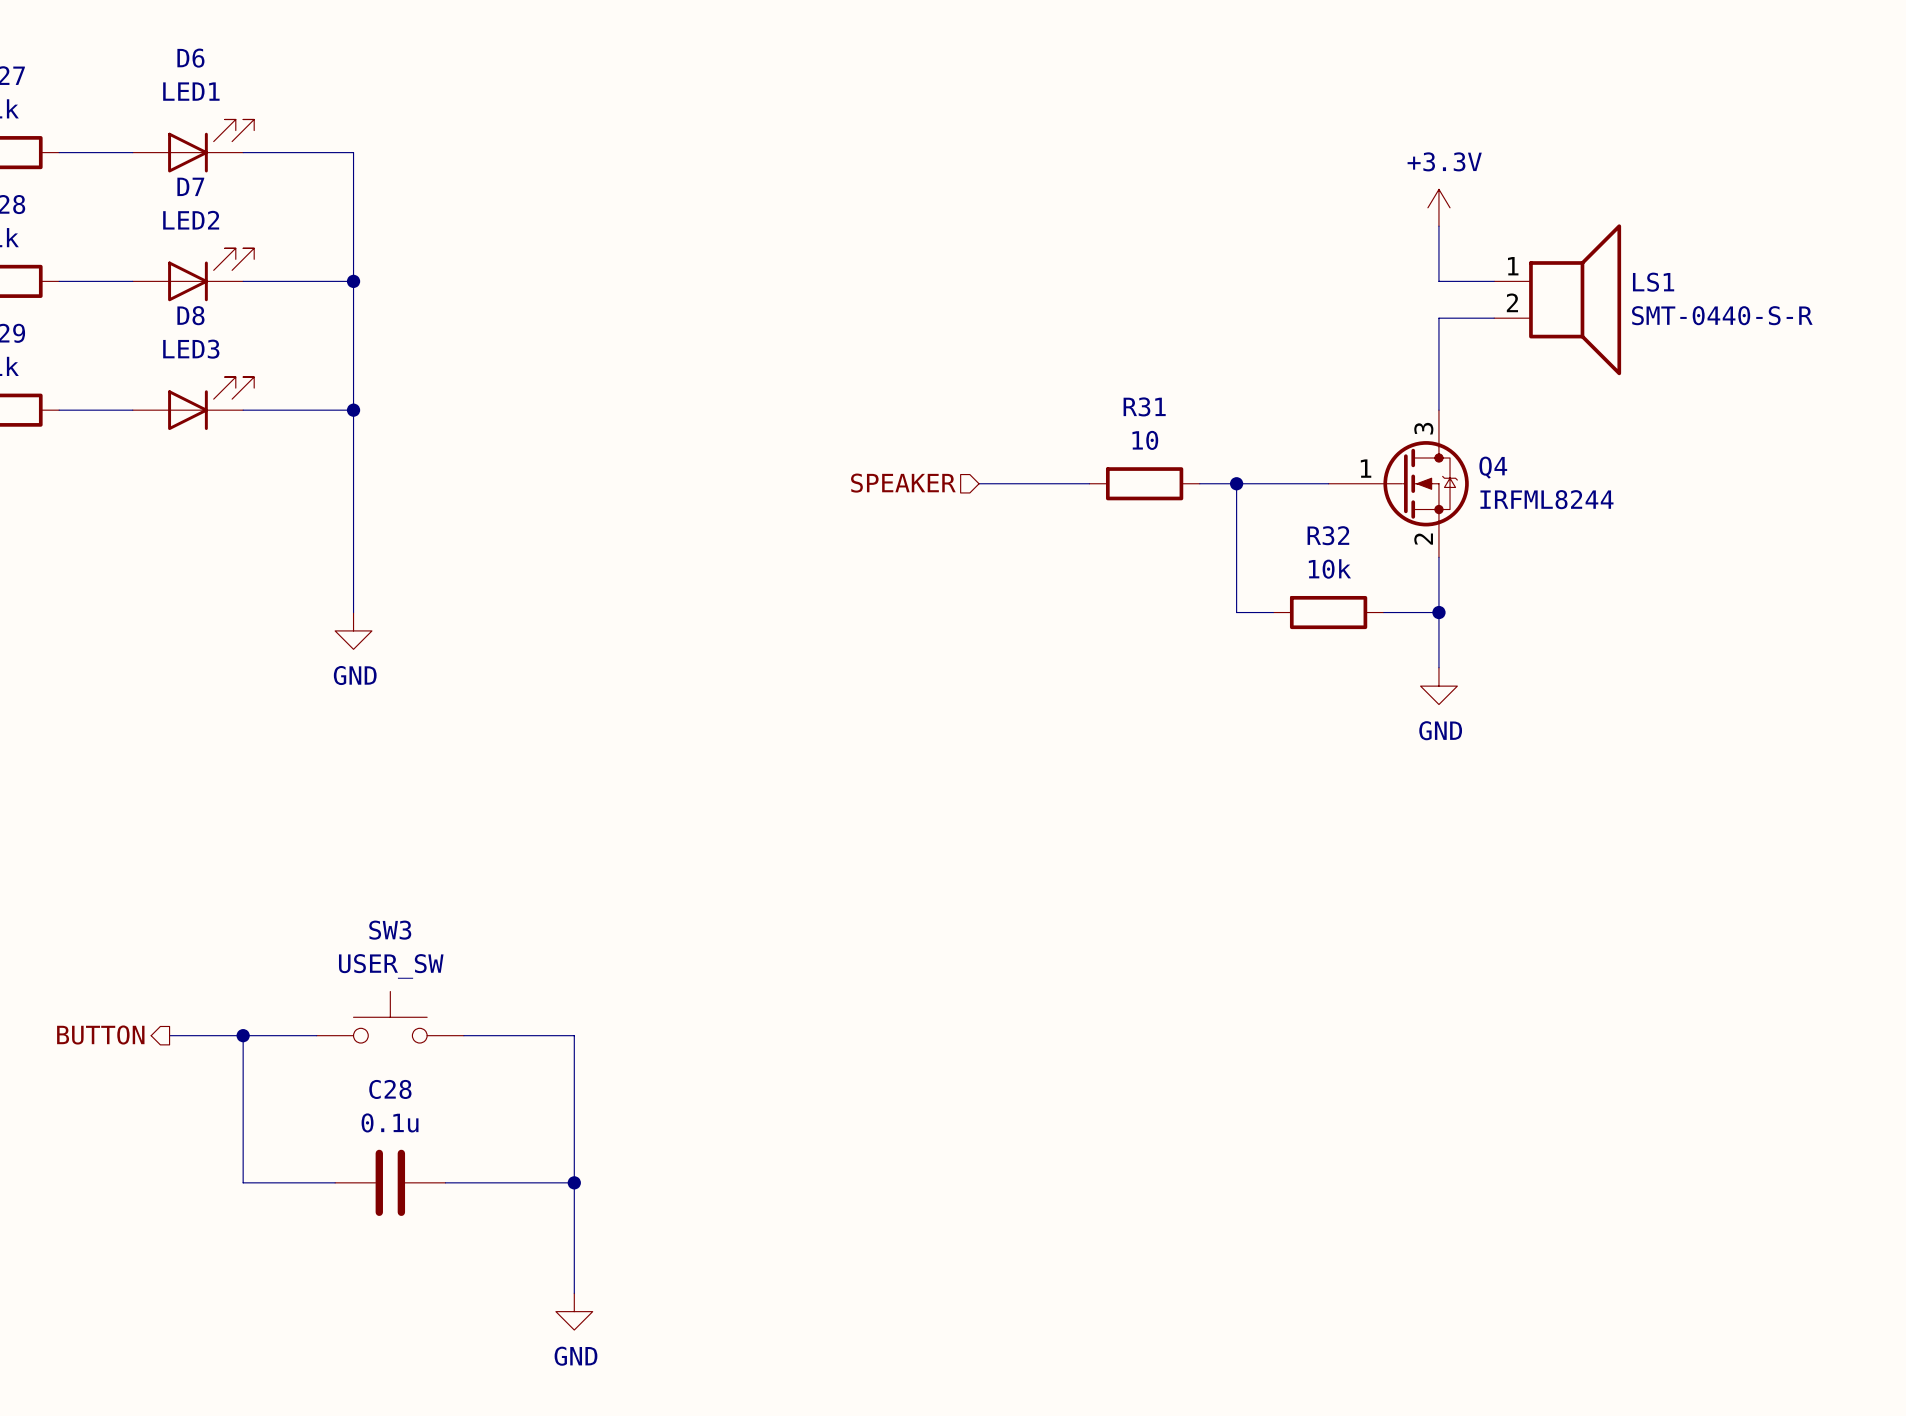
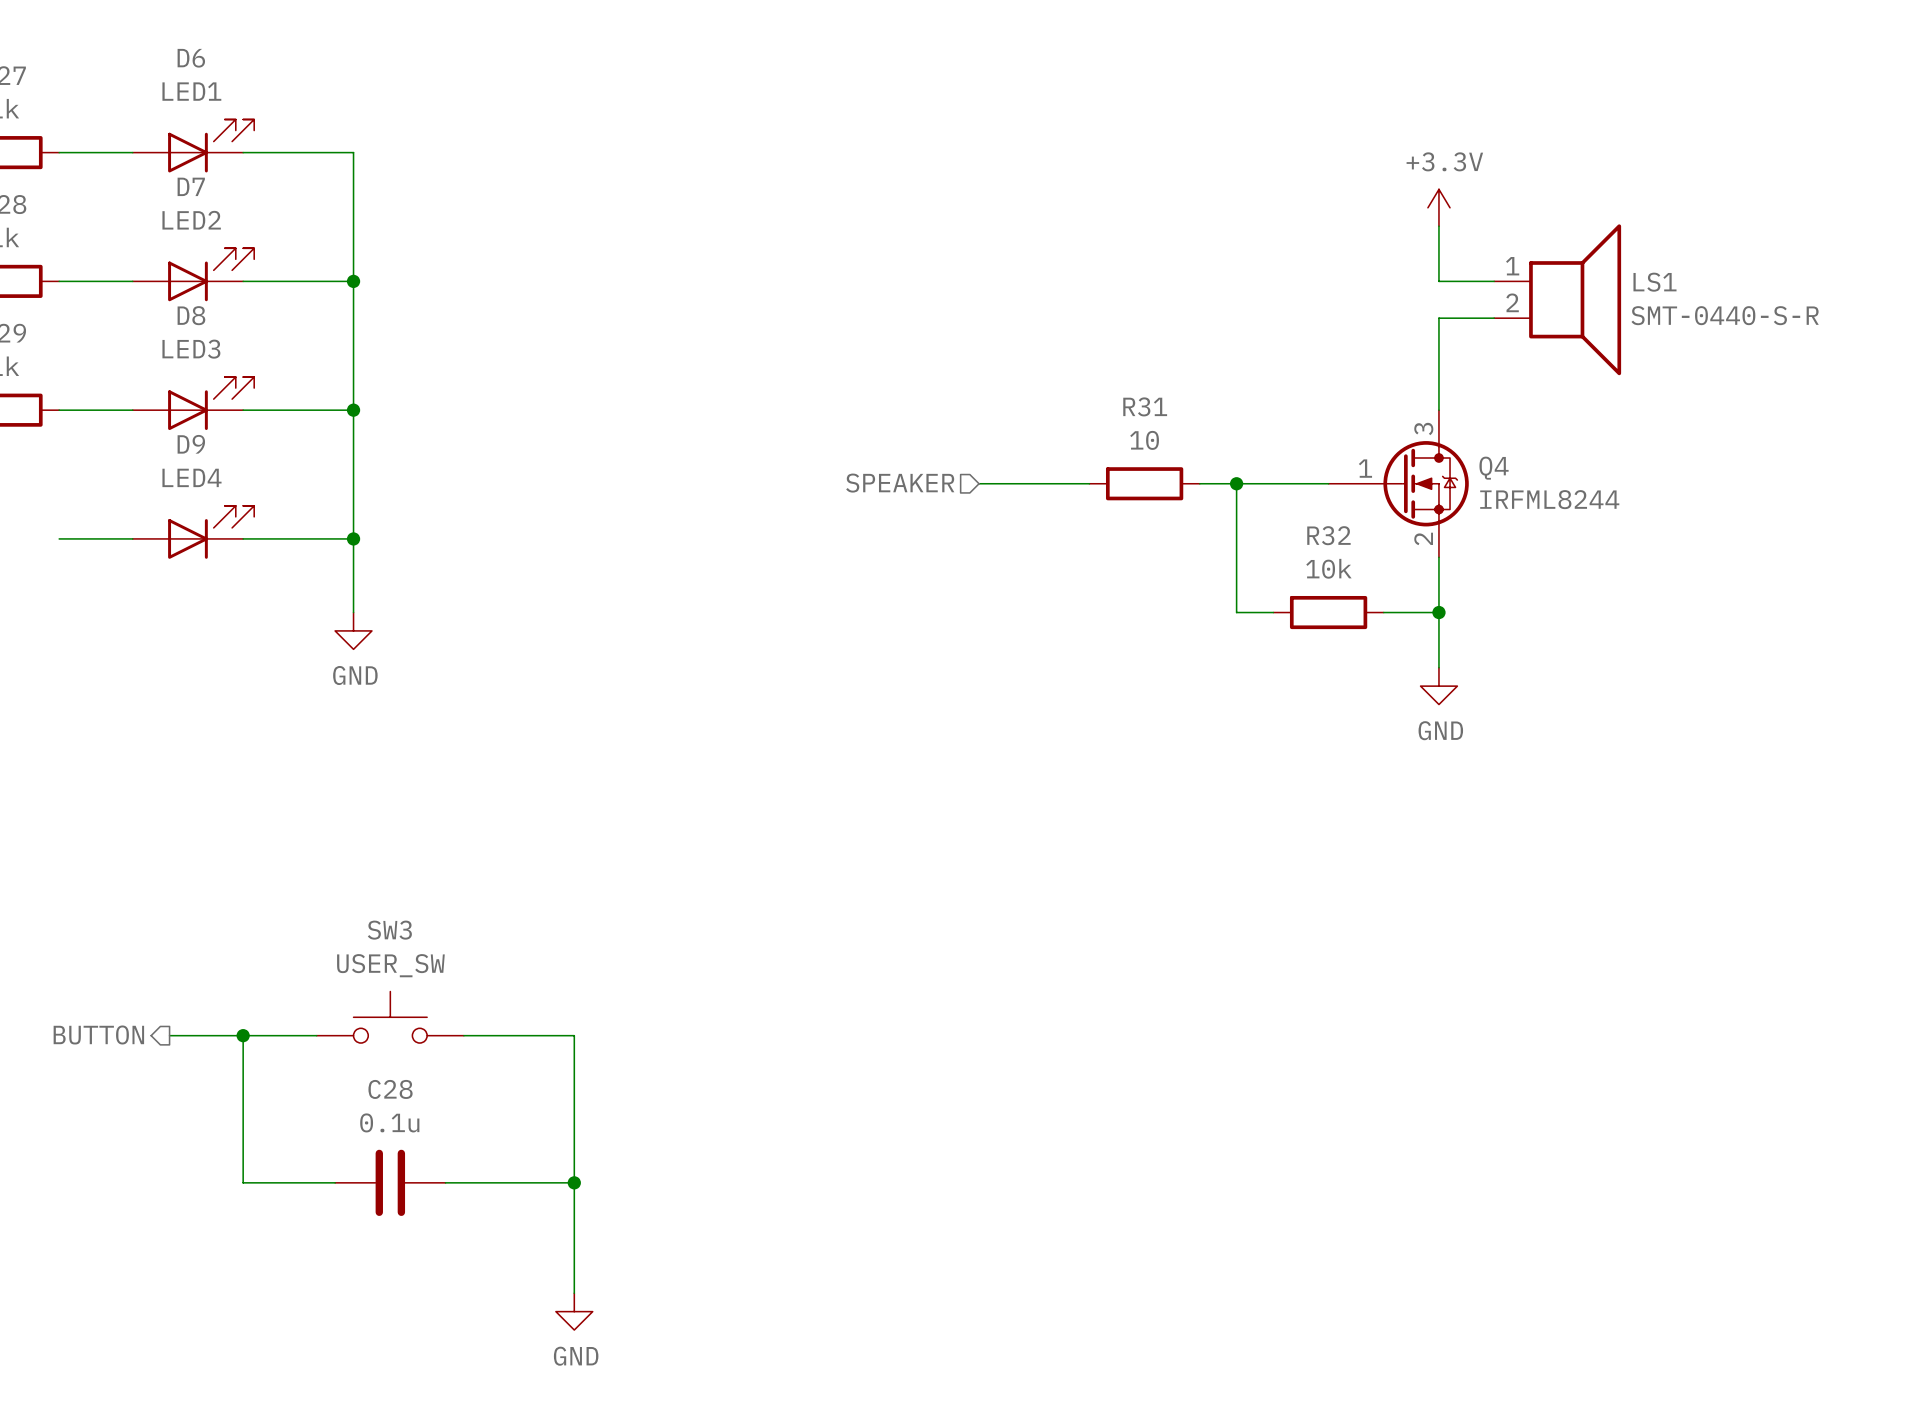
D9: none -> LED4 (193, 532)
wire: none -> (59, 538) (132, 538)
wire: none -> (243, 538) (353, 538)
junction: none -> (353, 538)

